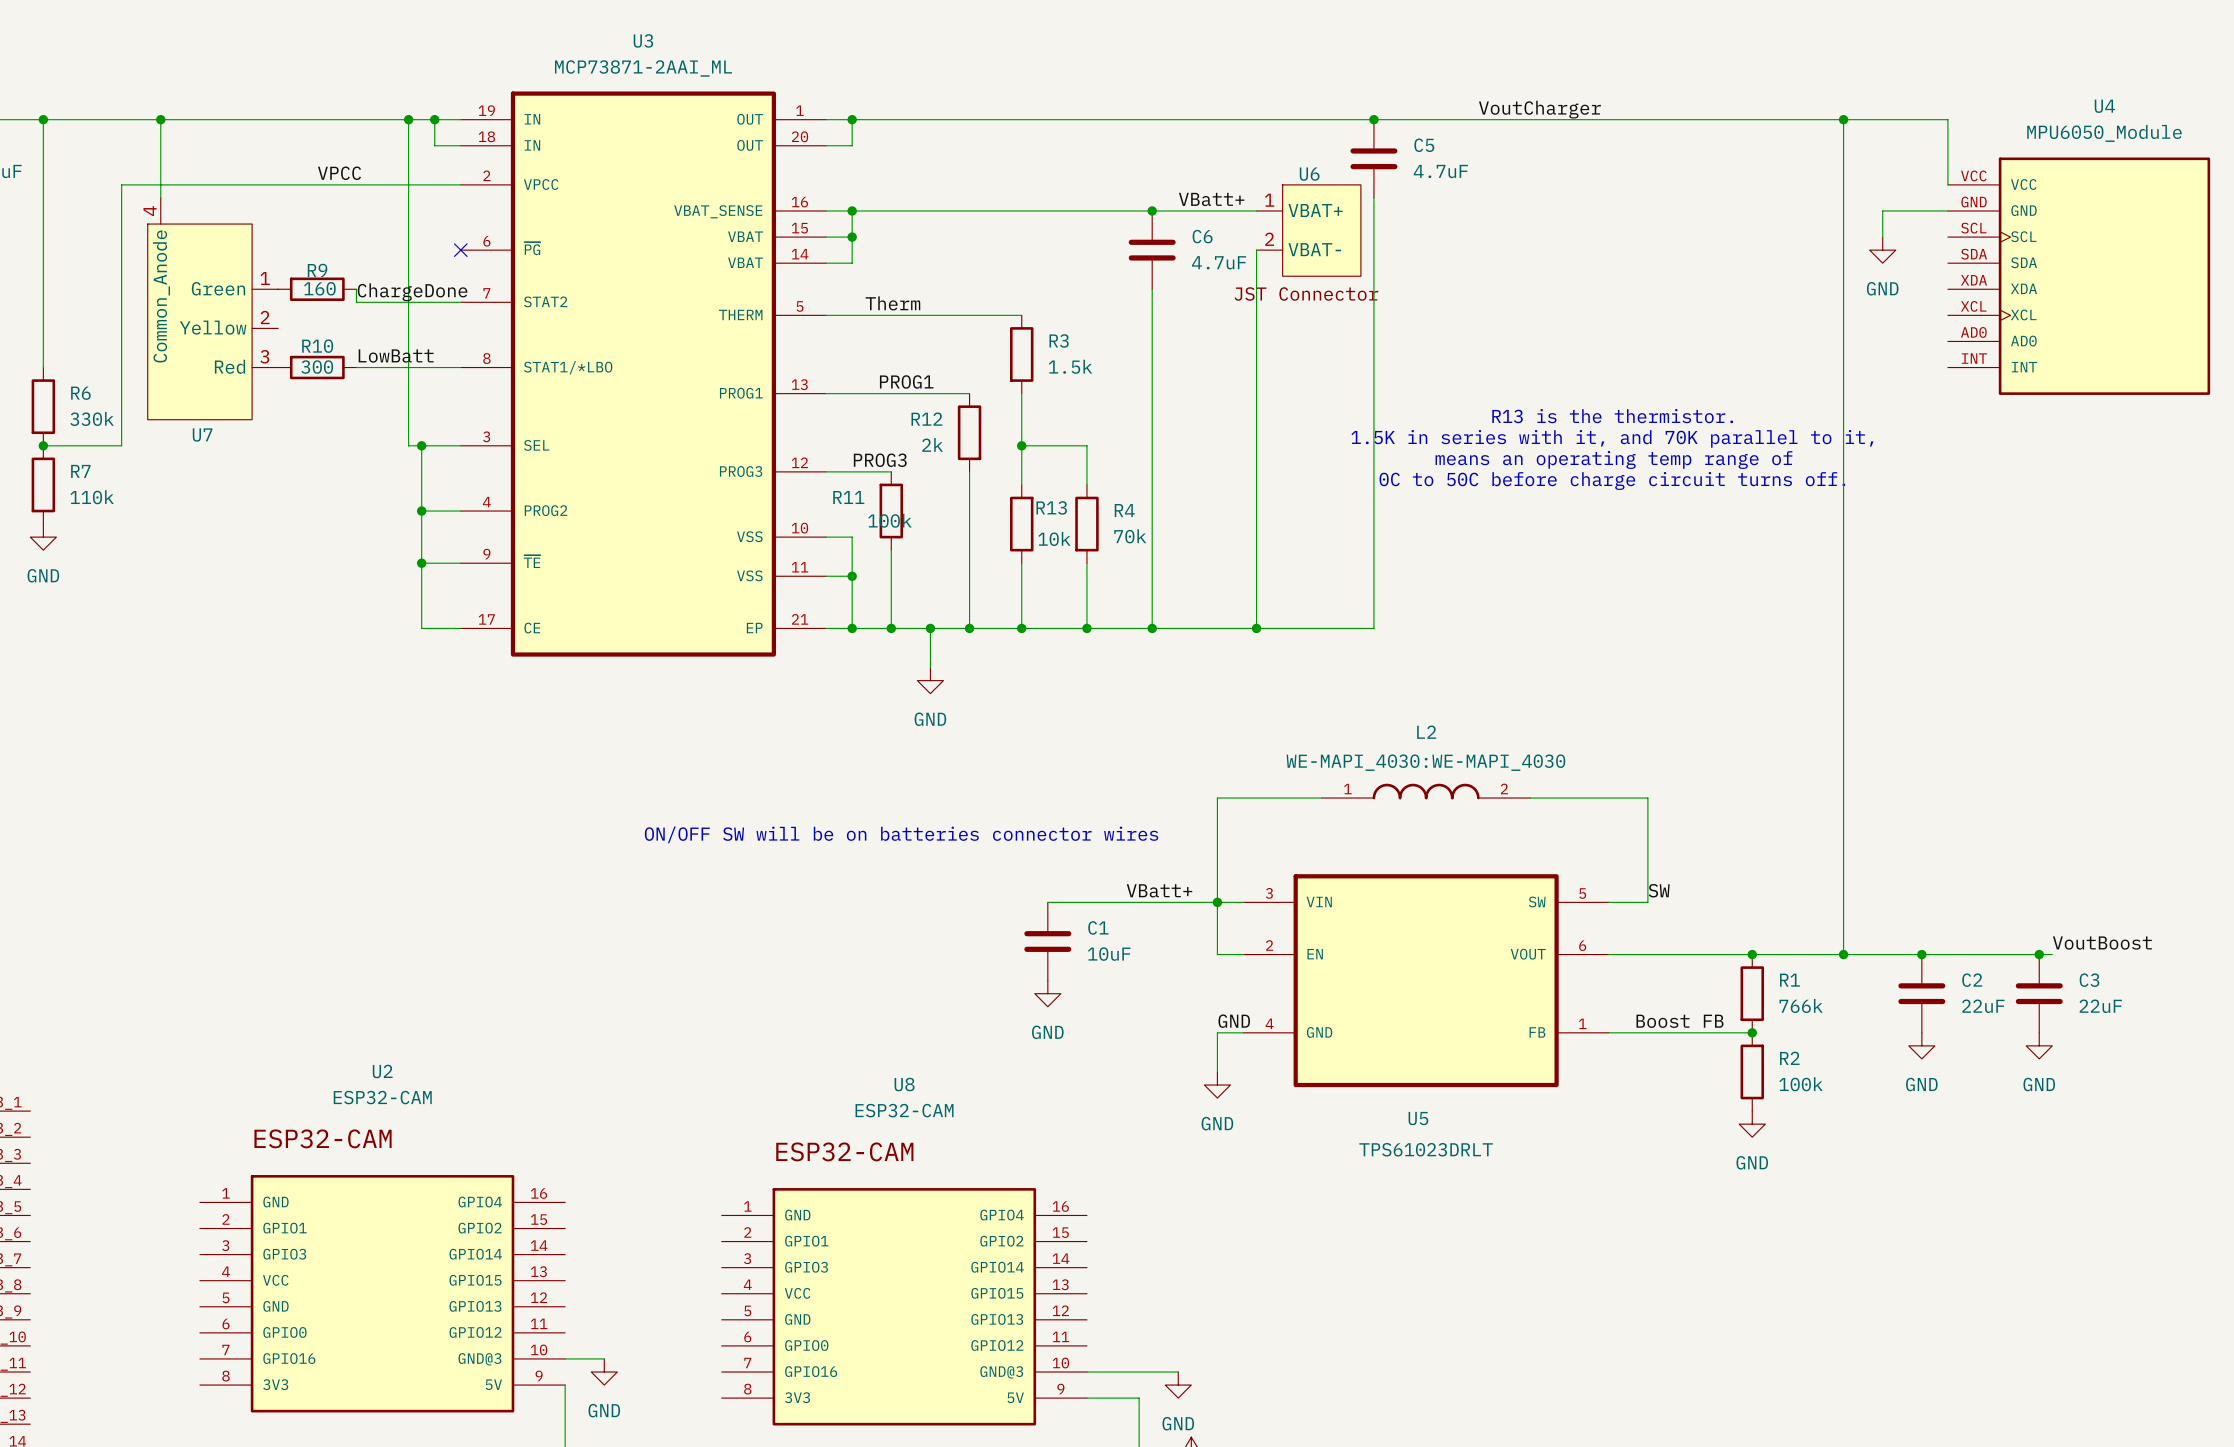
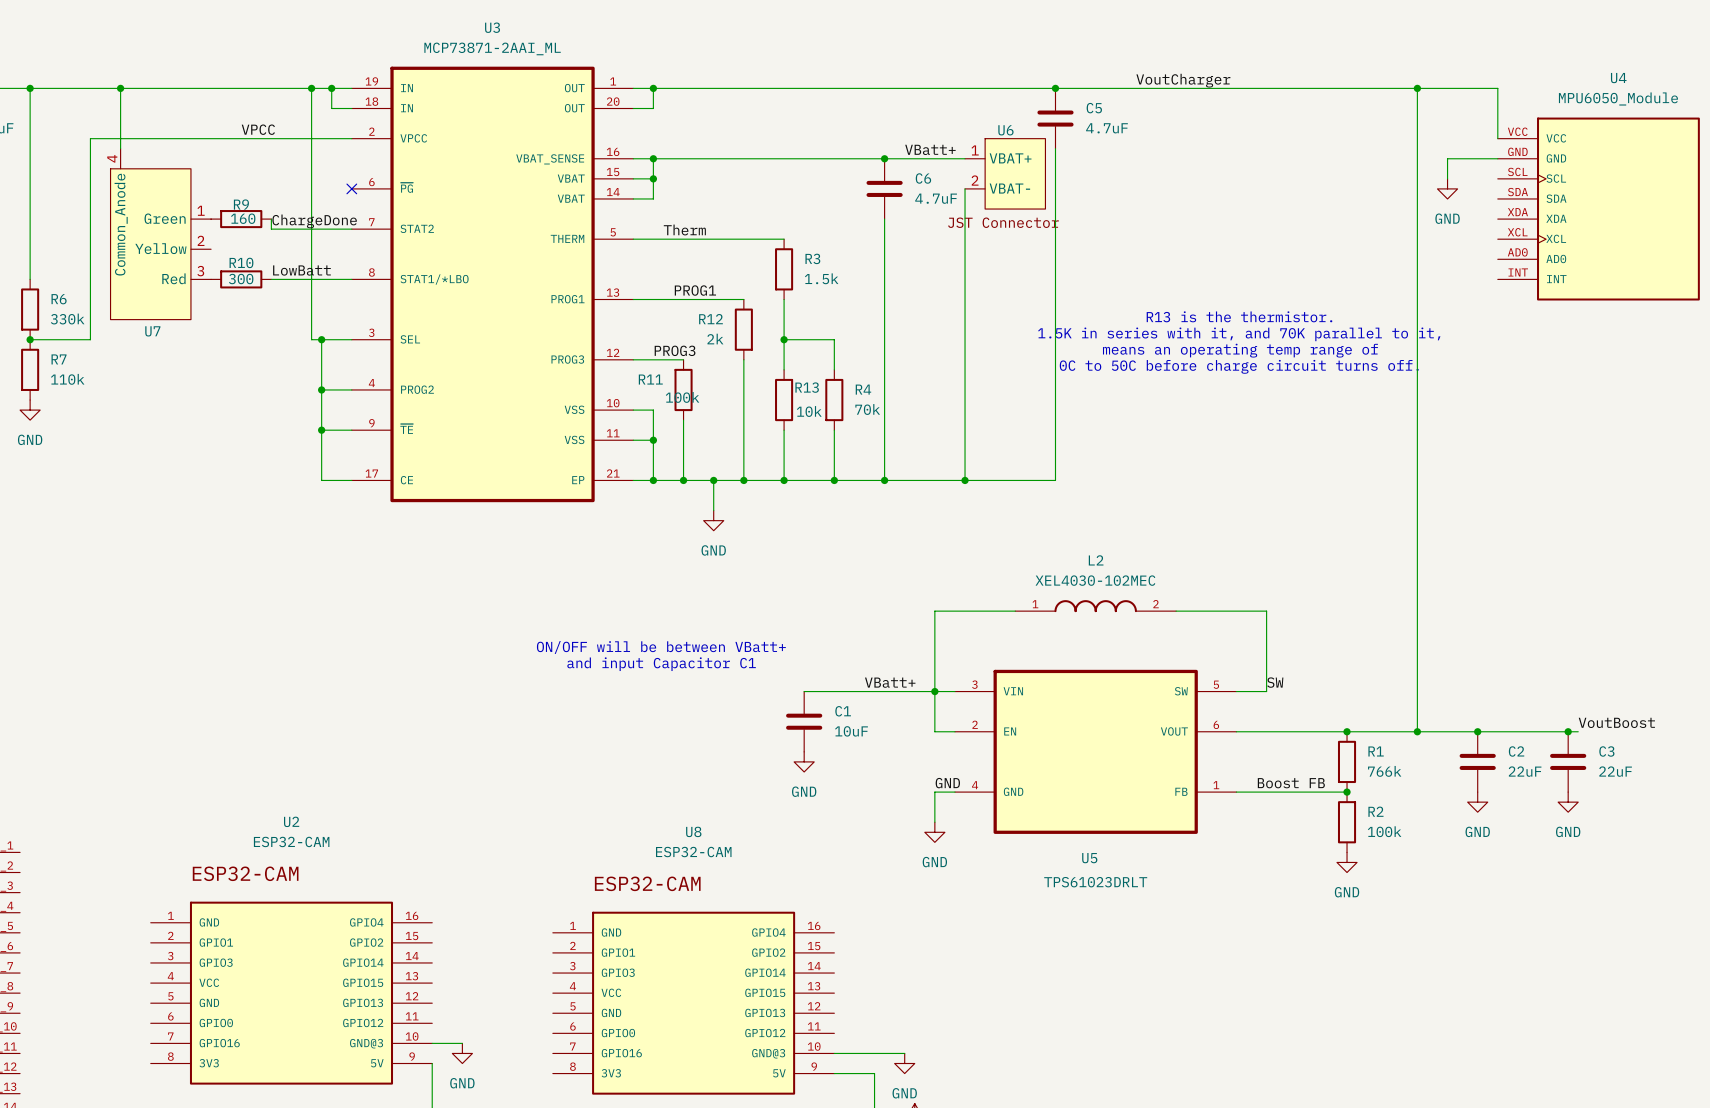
L2 value: none -> XEL4030-102MEC (1095, 580)
L2 text: WE-MAPI_4030:WE-MAPI_4030 (1425, 762) -> none
text: ON/OFF SW will be on batteries connector wires (901, 834) -> none
text: none -> ON/OFF will be between VBatt+ (661, 647)
text: none -> and input Capacitor C1 (661, 664)

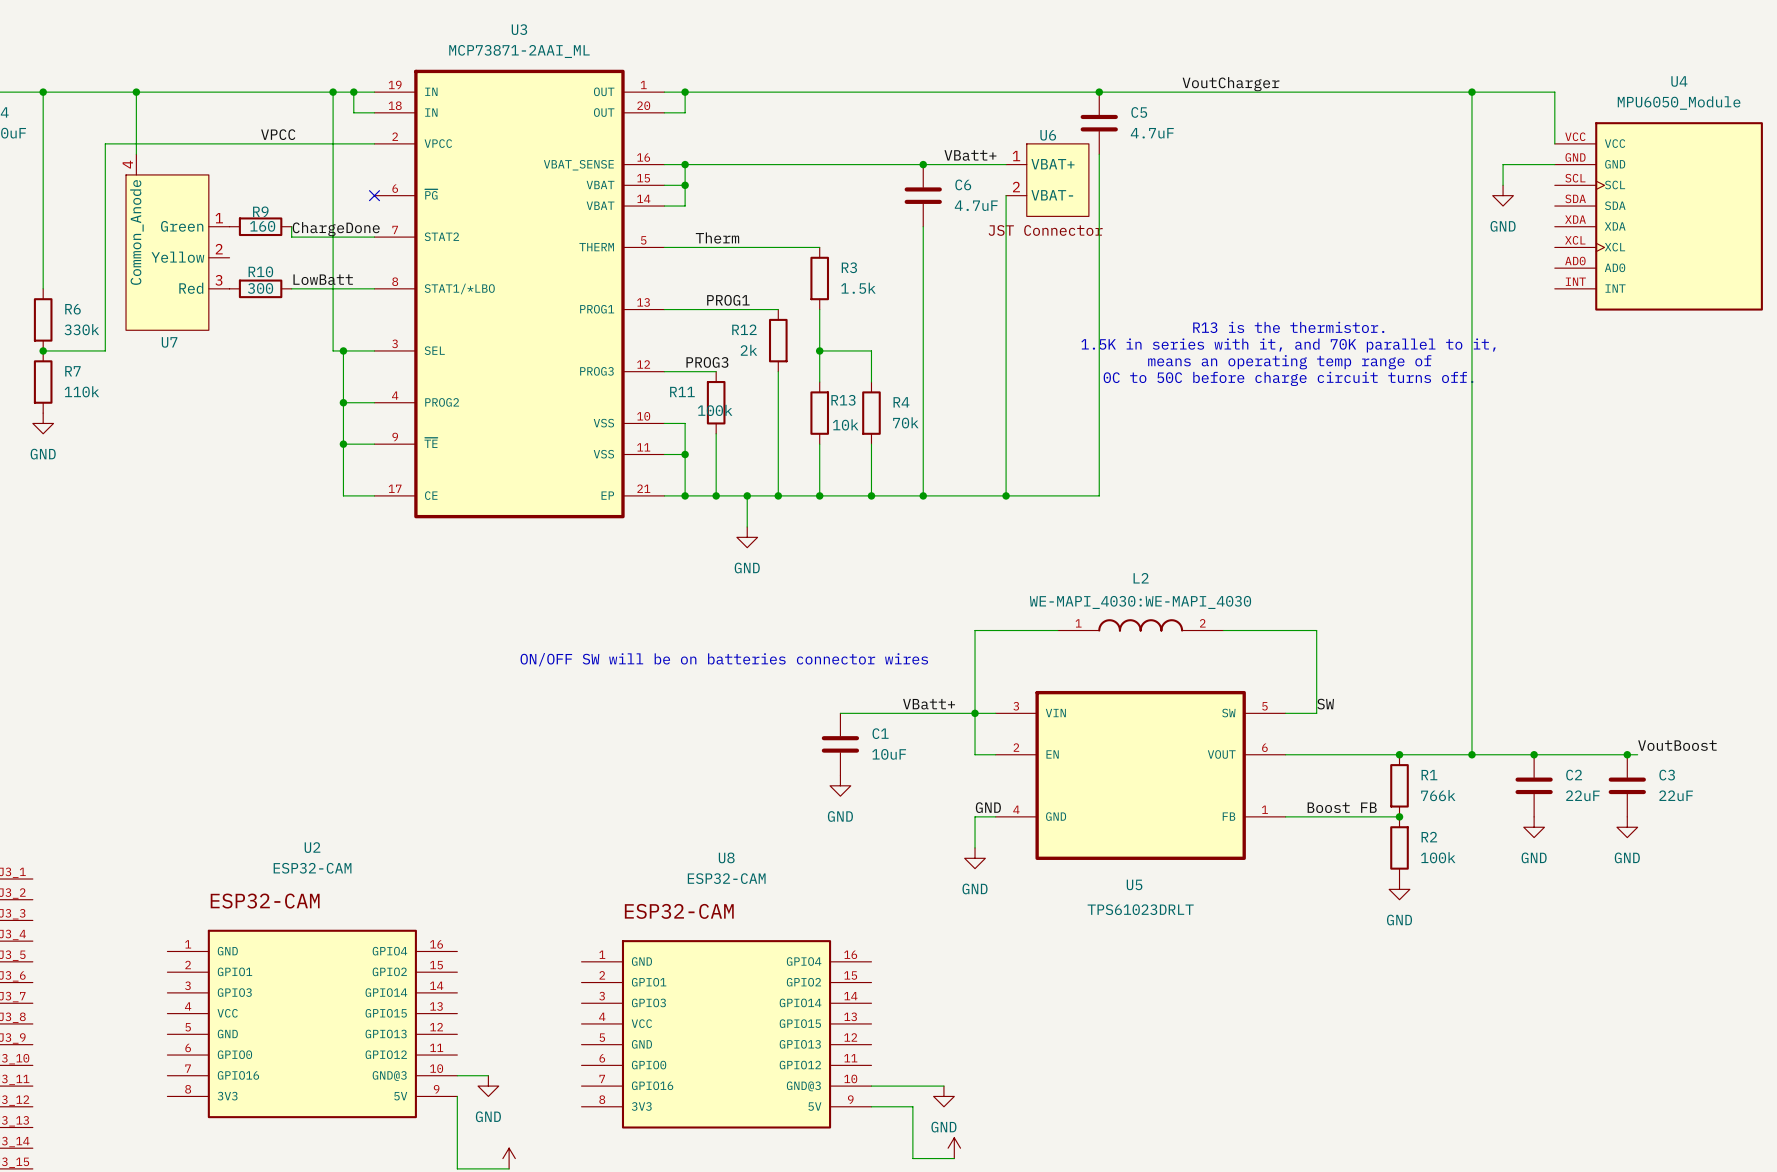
L2 value: XEL4030-102MEC (1095, 580) -> none
L2 text: none -> WE-MAPI_4030:WE-MAPI_4030 (1140, 602)
text: none -> ON/OFF SW will be on batteries connector wires (724, 659)
text: ON/OFF will be between VBatt+ (661, 647) -> none
text: and input Capacitor C1 (661, 664) -> none

